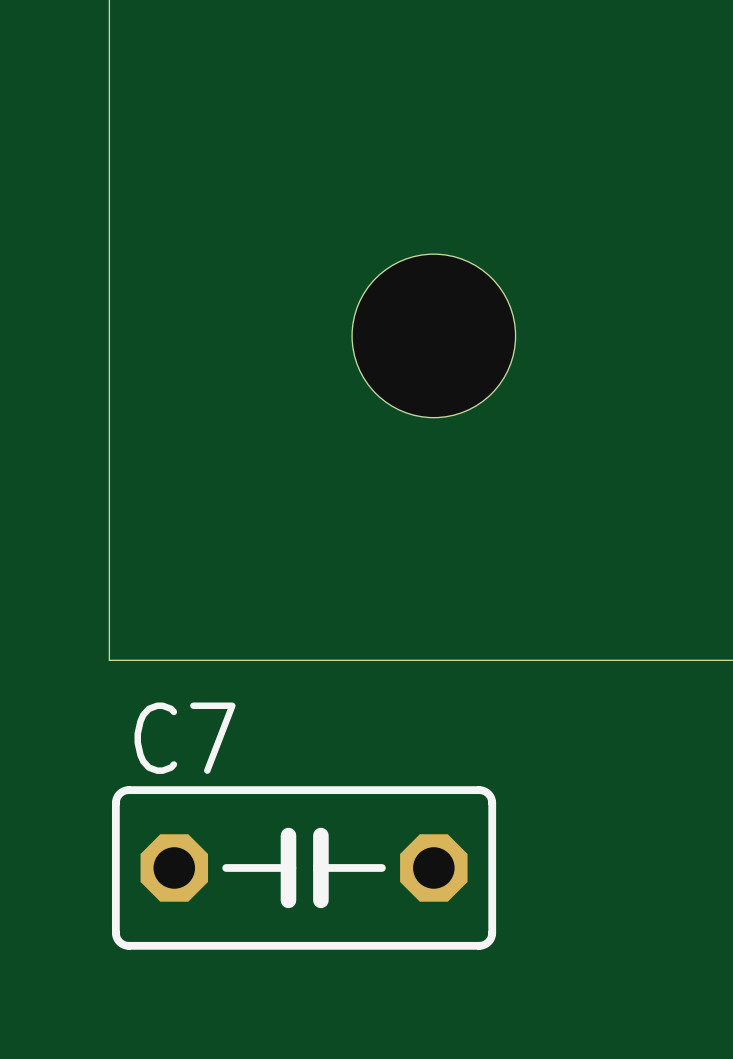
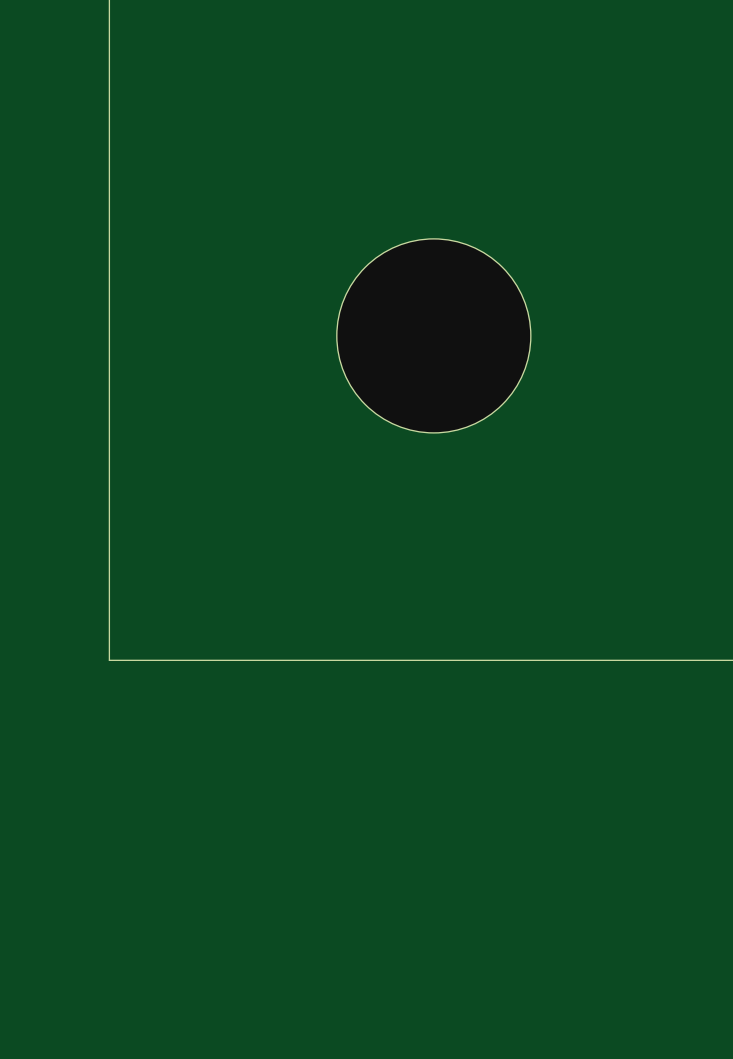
hole size: [352, 254, 516, 418] -> [336, 238, 531, 433]
C7: (304, 867) -> none

